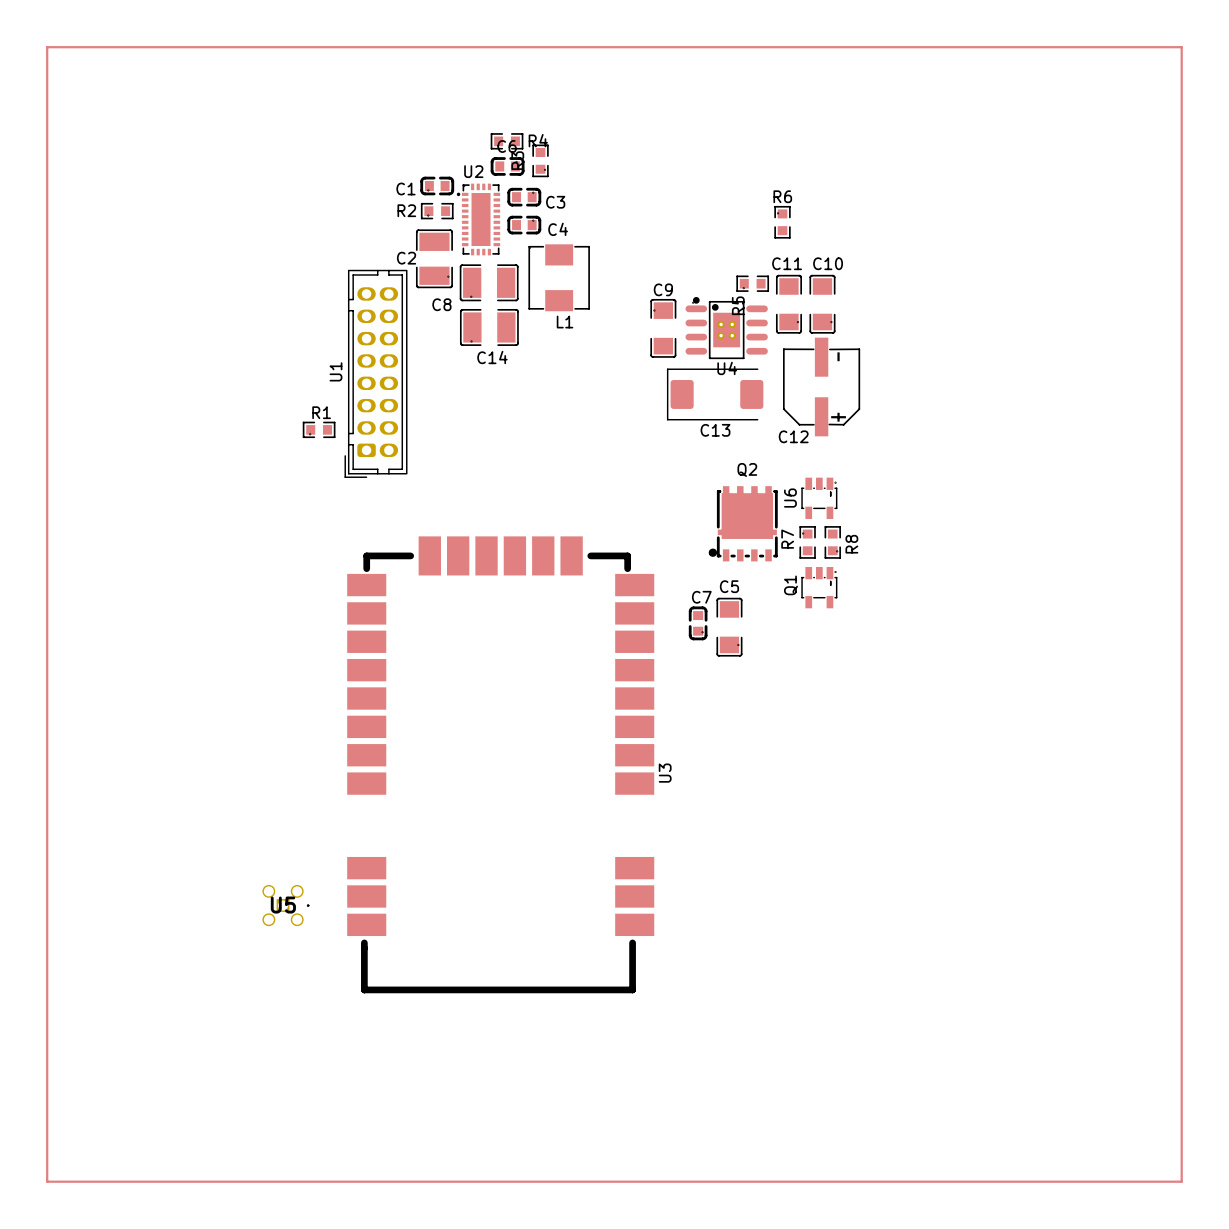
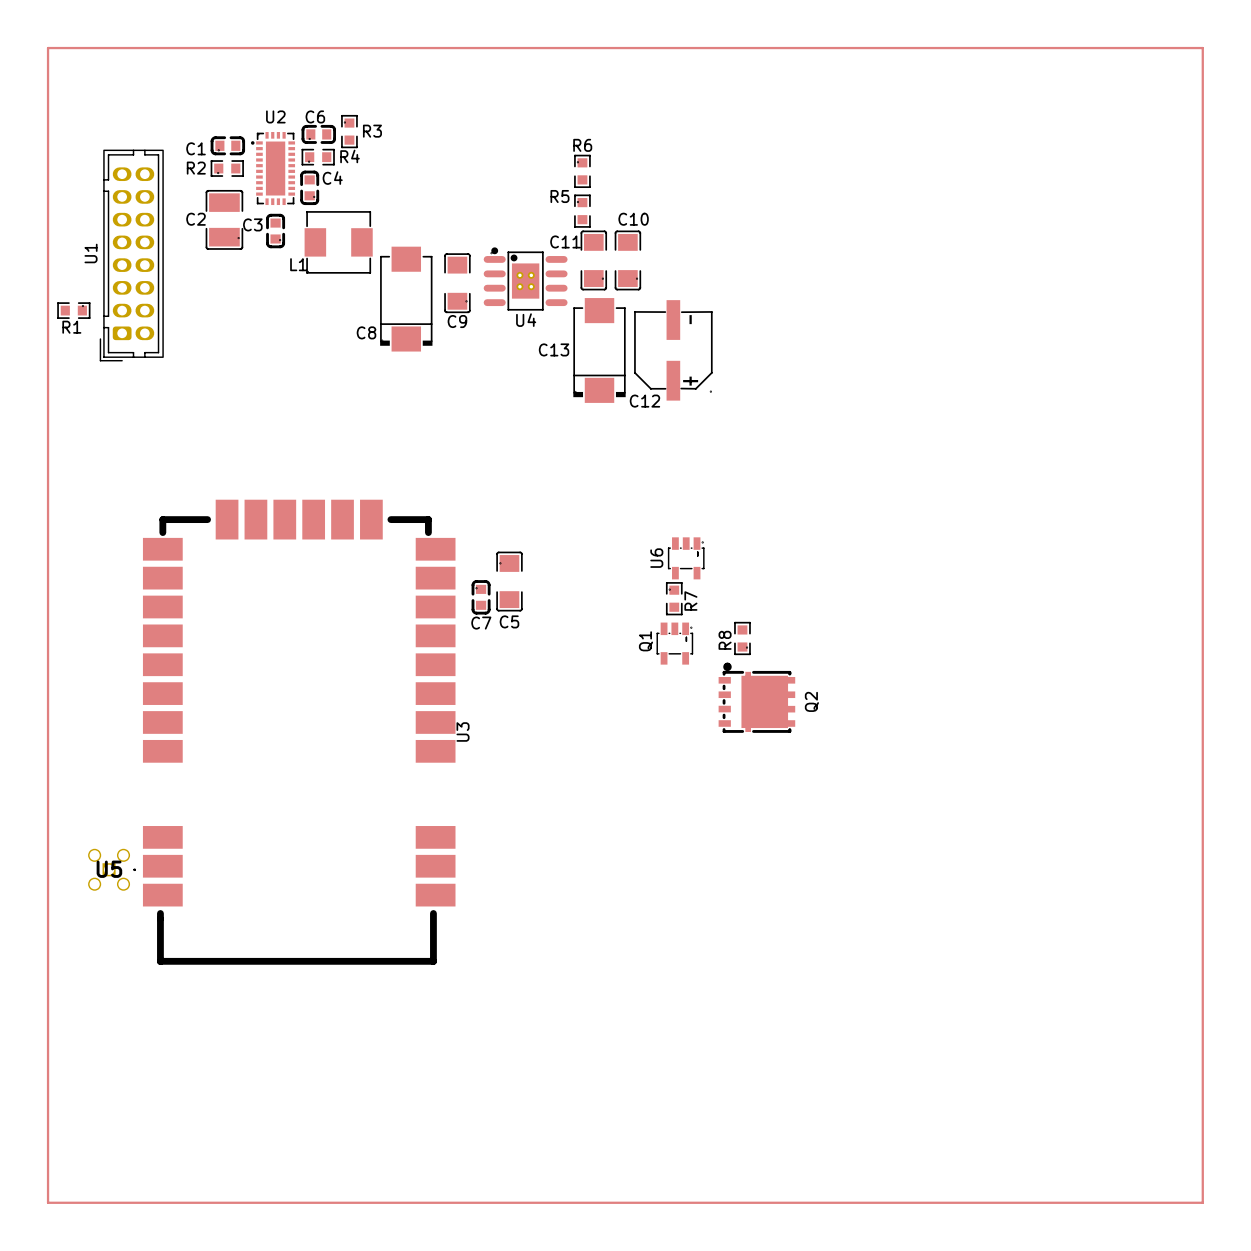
R4 position: (507, 141) -> (318, 157)
R3 rotation: 0° (540, 160) -> 180° (349, 131)
R3 position: (540, 160) -> (349, 131)
C6 rotation: 0° (507, 166) -> 180° (318, 134)
C6 position: (507, 166) -> (318, 134)
U2 name position: U2 (473, 171) -> U2 (275, 116)
C1 position: (437, 186) -> (227, 145)
C3 rotation: 0° (524, 197) -> 90° clockwise (275, 231)
C3 position: (524, 197) -> (275, 231)
C3 name position: C3 (555, 202) -> C3 (252, 224)
R2 position: (437, 211) -> (227, 168)
U2 position: (478, 219) -> (273, 168)
R6 position: (782, 222) -> (582, 171)
C4 rotation: 0° (524, 225) -> 90° clockwise (309, 187)
C4 position: (524, 225) -> (309, 187)
C2 position: (434, 258) -> (224, 219)
C11 name position: C11 (787, 263) -> C11 (565, 241)
C8 footprint: [459, 264, 519, 302] -> [380, 246, 433, 352]
L1 rotation: 0° (559, 277) -> 90° counterclockwise (338, 242)
L1 position: (559, 277) -> (338, 242)
R5 rotation: 0° (752, 283) -> 90° clockwise (582, 211)
R5 position: (752, 283) -> (582, 211)
C11 position: (788, 304) -> (593, 260)
C10 position: (822, 304) -> (627, 260)
L1 name position: L1 (565, 322) -> L1 (298, 264)
C14: (489, 327) -> none
C9 rotation: 0° (663, 328) -> 180° (457, 283)
C9 position: (663, 328) -> (457, 283)
U4 position: (726, 328) -> (525, 279)
C12 footprint: [783, 337, 861, 437] -> [634, 300, 713, 401]
C13 footprint: [666, 368, 764, 421] -> [573, 298, 626, 403]
U1 position: (375, 373) -> (131, 255)
R1 rotation: 0° (319, 429) -> 180° (73, 310)
R1 position: (319, 429) -> (73, 310)
C13 name position: C13 (715, 430) -> C13 (554, 349)
U6 position: (819, 498) -> (686, 558)
Q2 rotation: 0° (743, 523) -> 90° clockwise (756, 697)
Q2 position: (743, 523) -> (756, 697)
U3 footprint: [347, 536, 655, 994] -> [142, 499, 456, 965]
R7 name position: R7 (787, 539) -> R7 (690, 601)
R7 position: (807, 542) -> (674, 598)
R8 position: (832, 542) -> (742, 638)
R8 name position: R8 (851, 544) -> R8 (725, 640)
Q1 position: (819, 587) -> (674, 643)
C7 rotation: 0° (698, 623) -> 180° (481, 597)
C7 position: (698, 623) -> (481, 597)
C5 rotation: 0° (729, 627) -> 180° (509, 581)
C5 position: (729, 627) -> (509, 581)
U5 position: (285, 905) -> (111, 869)

